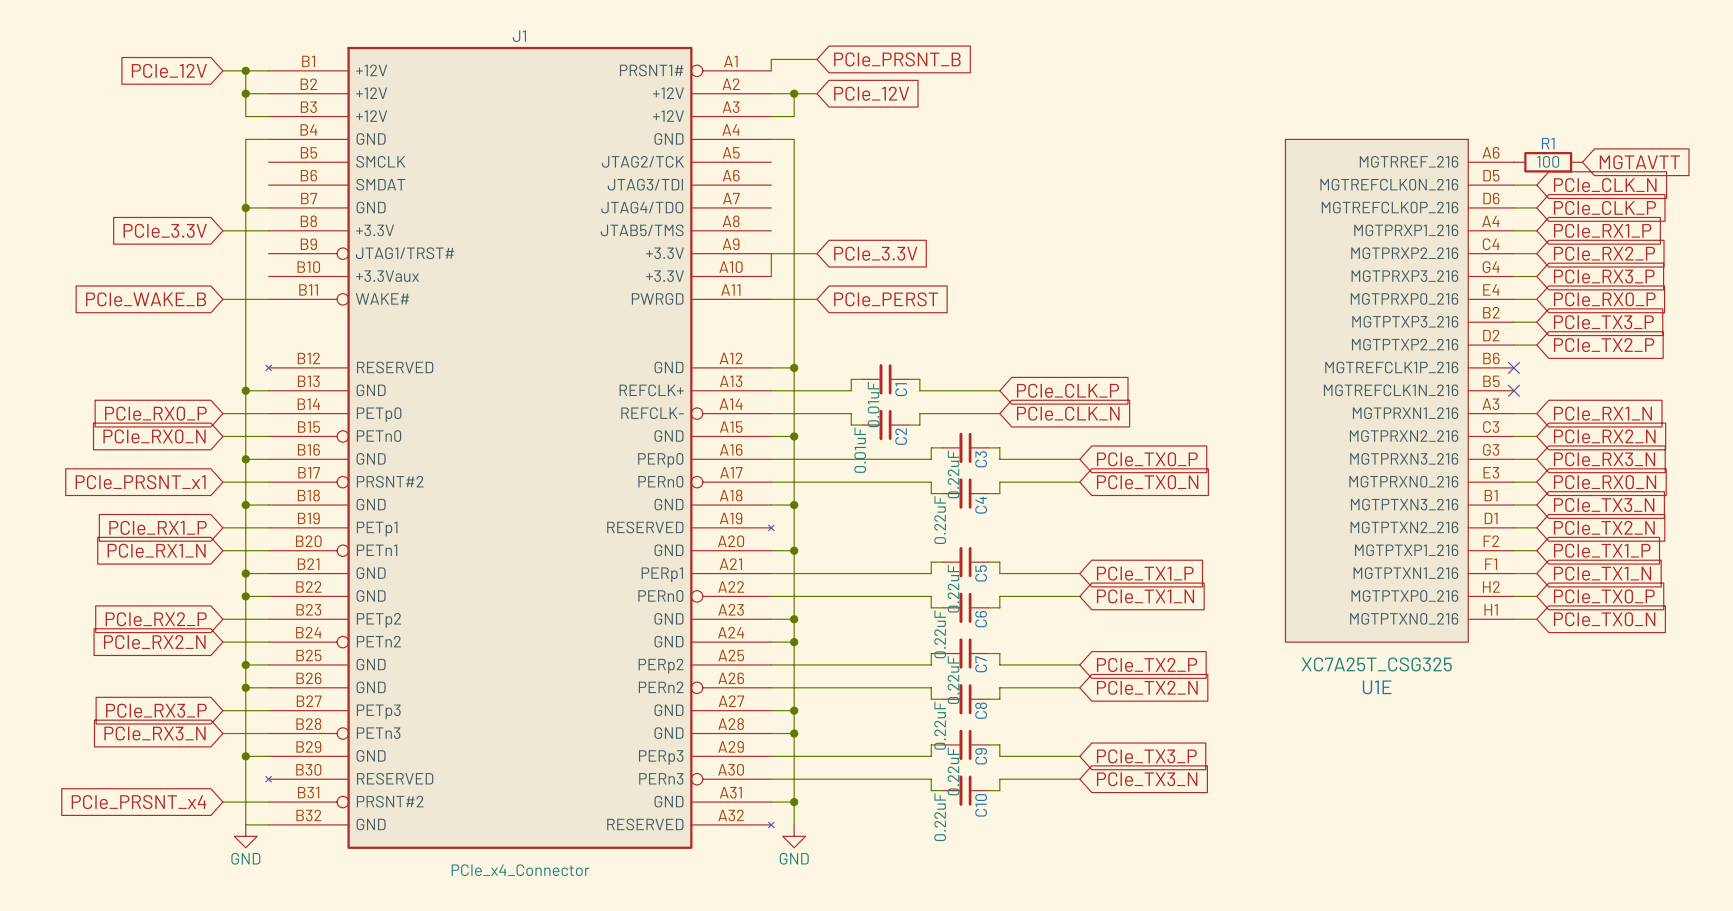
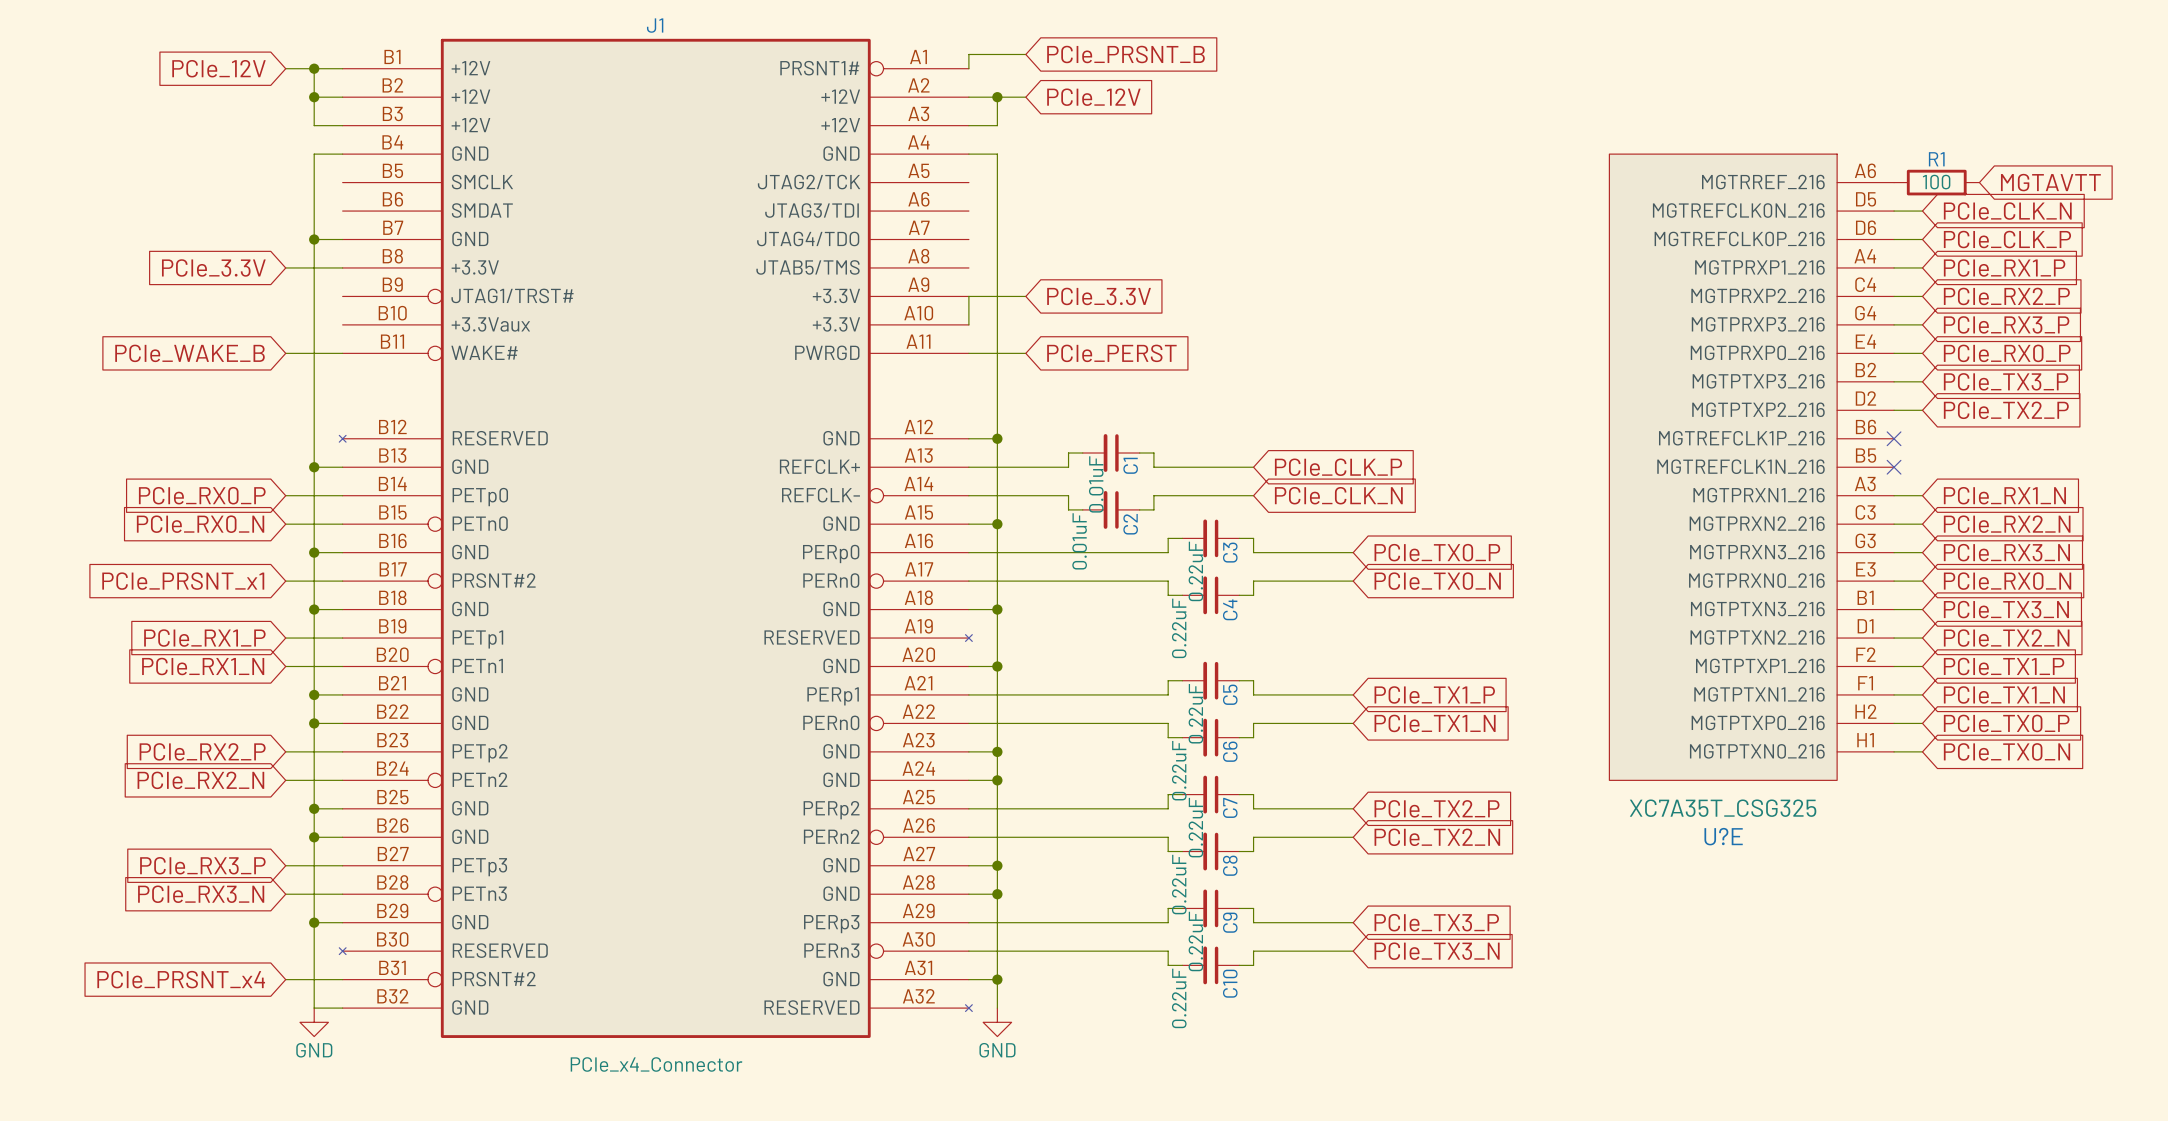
U1E value: XC7A25T_CSG325 (1376, 664) -> XC7A35T_CSG325 (1723, 808)
U1E name: U1E (1377, 687) -> U?E (1723, 836)

